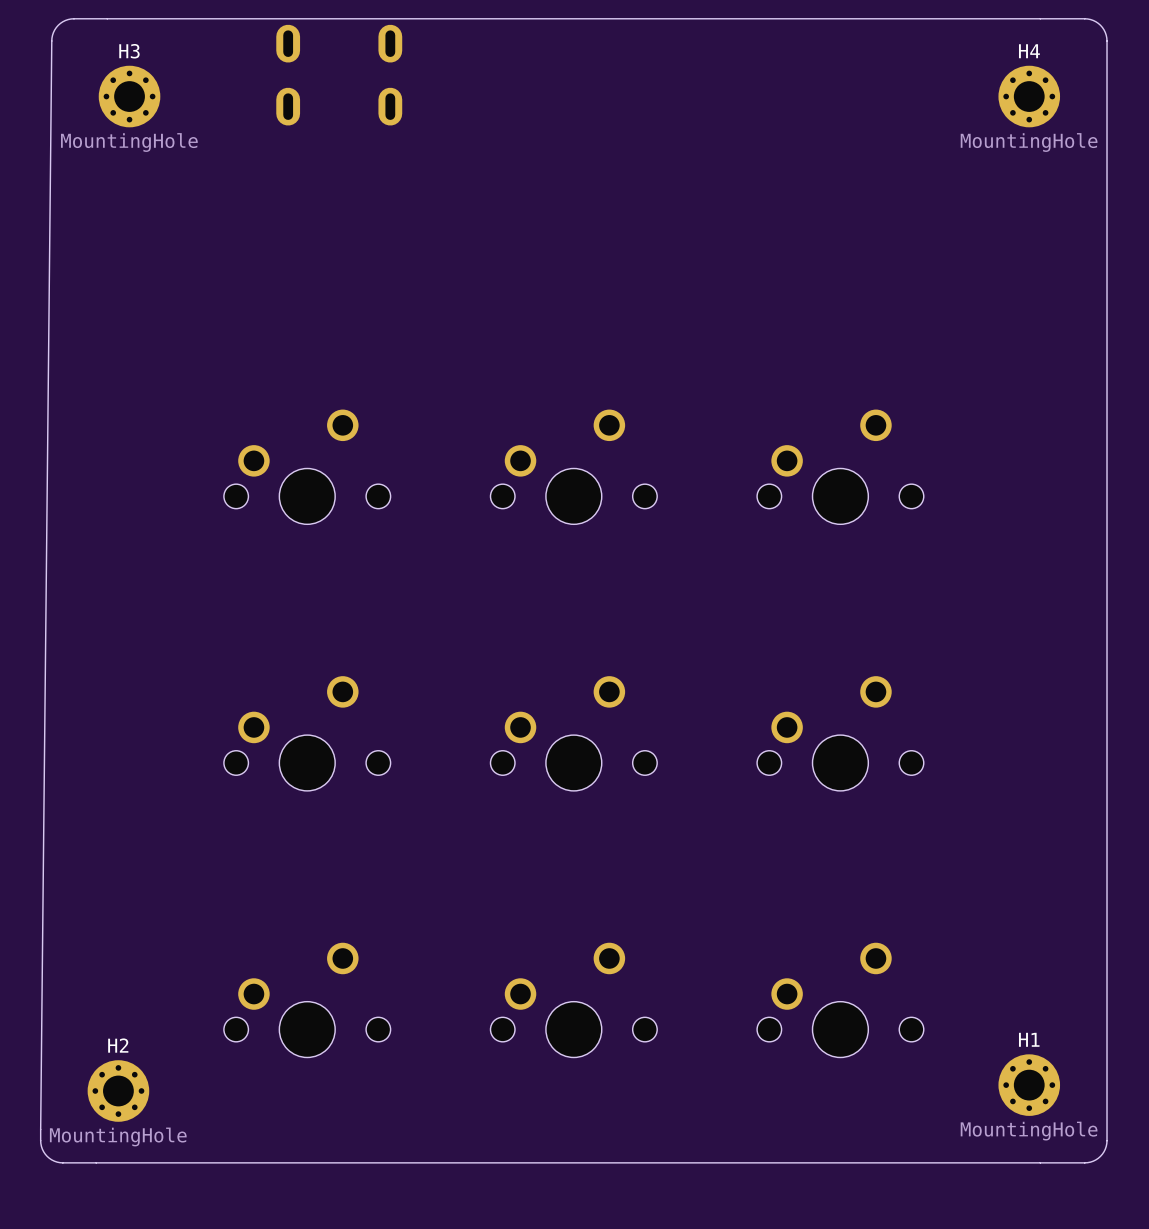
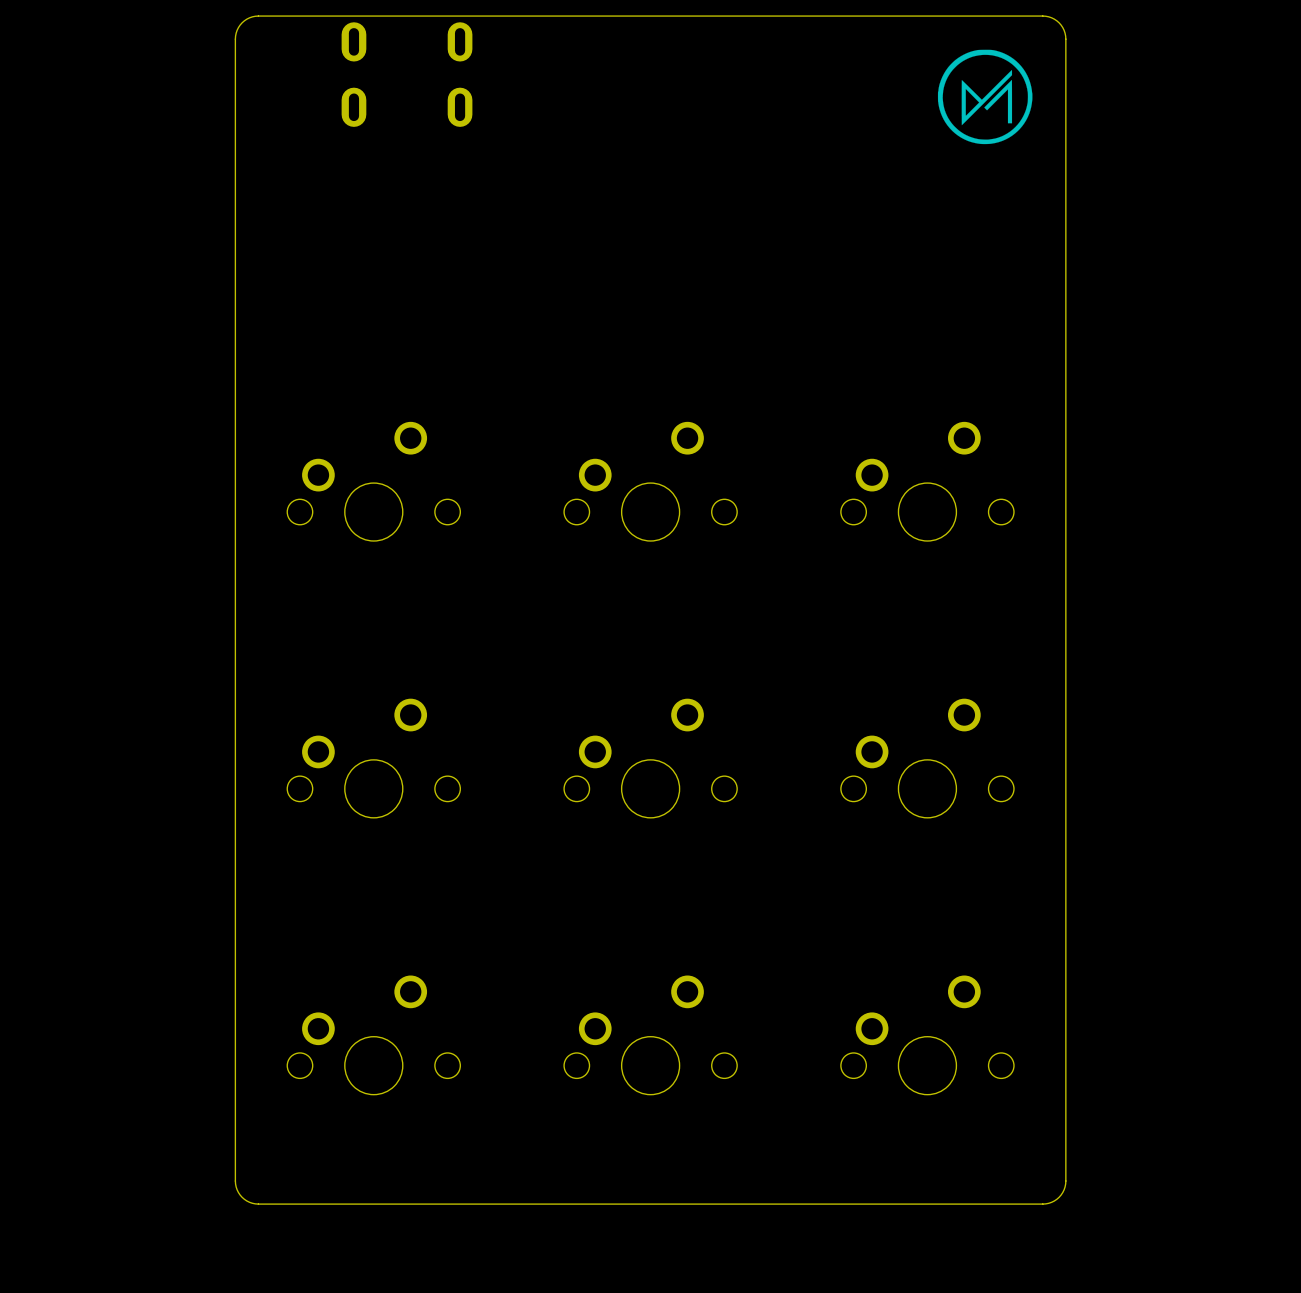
board edge: (196, 18) (71, 18) (58, 25) (51, 38) (40, 1129) (40, 1143) (43, 1151) (49, 1158) (57, 1162) (196, 1162) -> (258, 16) (249, 17) (242, 22) (237, 30) (235, 39) (235, 1181) (237, 1189) (242, 1197) (249, 1202) (258, 1204)
board edge: (951, 18) (1087, 18) (1100, 25) (1105, 32) (1107, 41) (1106, 1143) (1100, 1156) (1087, 1162) (951, 1162) -> (1042, 16) (1051, 17) (1059, 22) (1064, 30) (1065, 39) (1065, 1181) (1064, 1189) (1059, 1197) (1051, 1202) (1042, 1204)
drawing: none -> [937, 49, 1033, 145]
H3: MountingHole (129, 96) -> none
H4: MountingHole (1029, 96) -> none
H1: MountingHole (1029, 1085) -> none
H2: MountingHole (118, 1091) -> none

